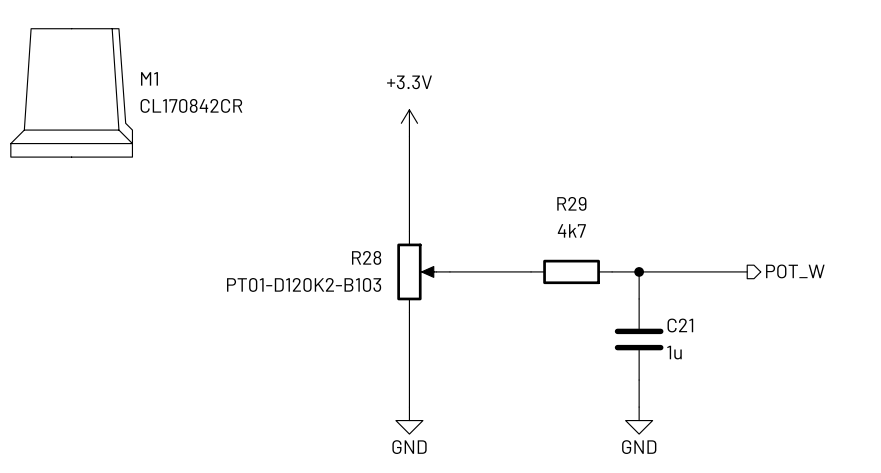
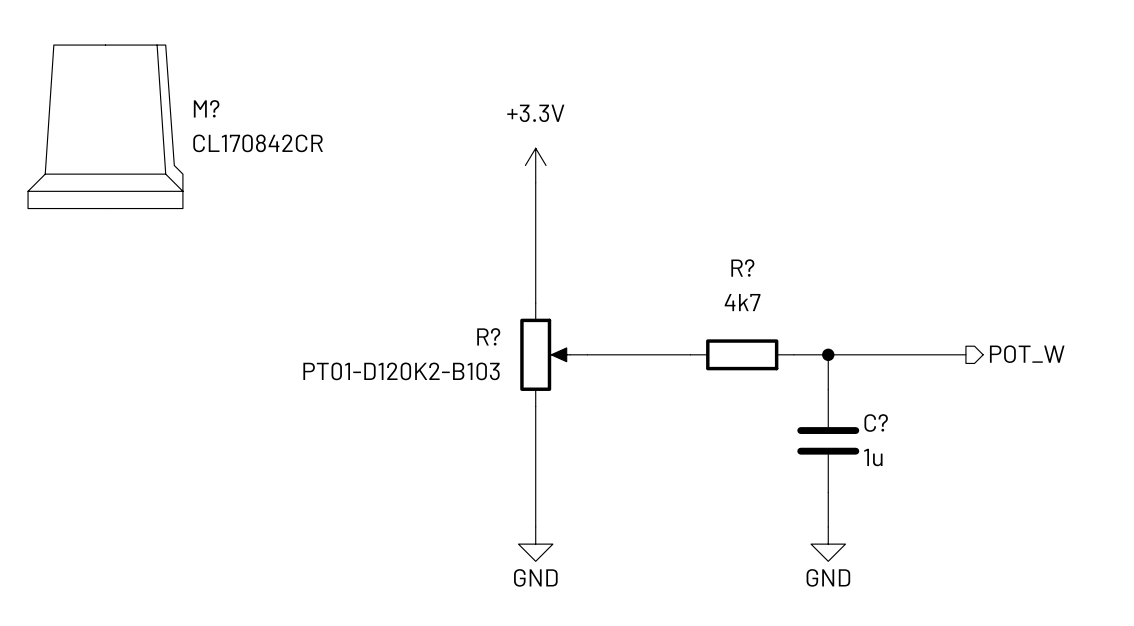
M1 name: M1 (149, 78) -> M? (206, 108)
R29 name: R29 (571, 203) -> R? (742, 268)
R28 name: R28 (366, 257) -> R? (488, 336)
C21 name: C21 (680, 325) -> C? (876, 423)

